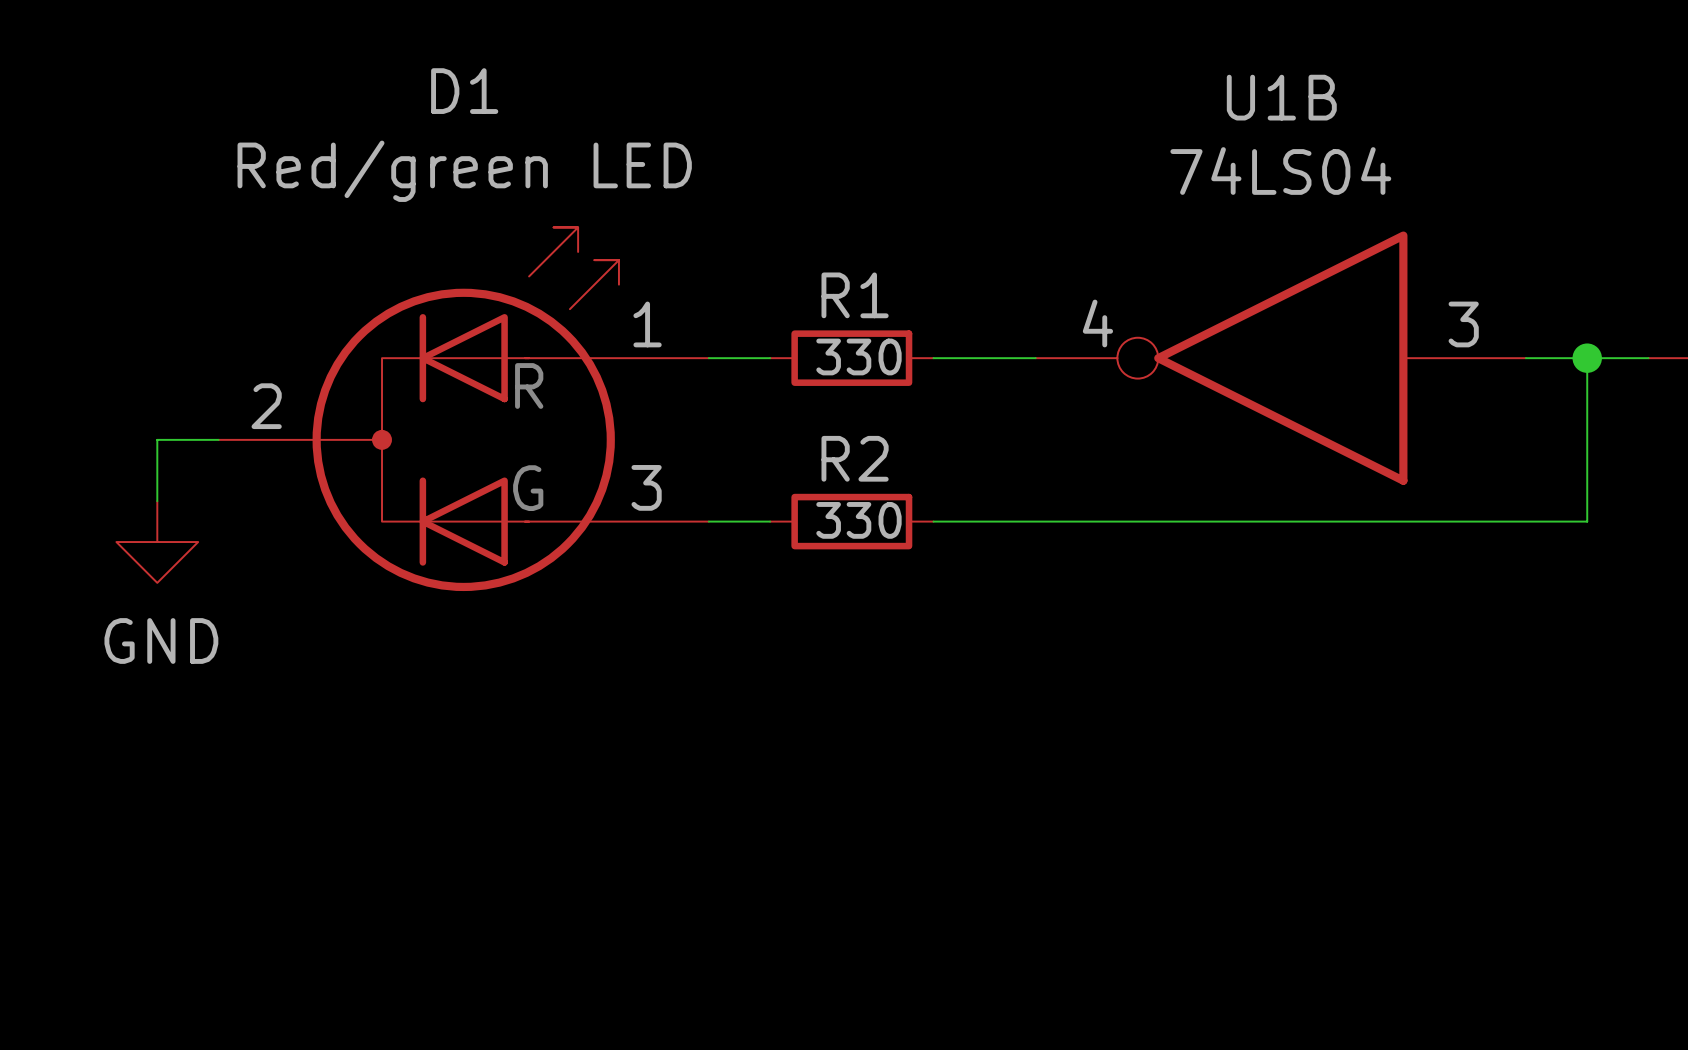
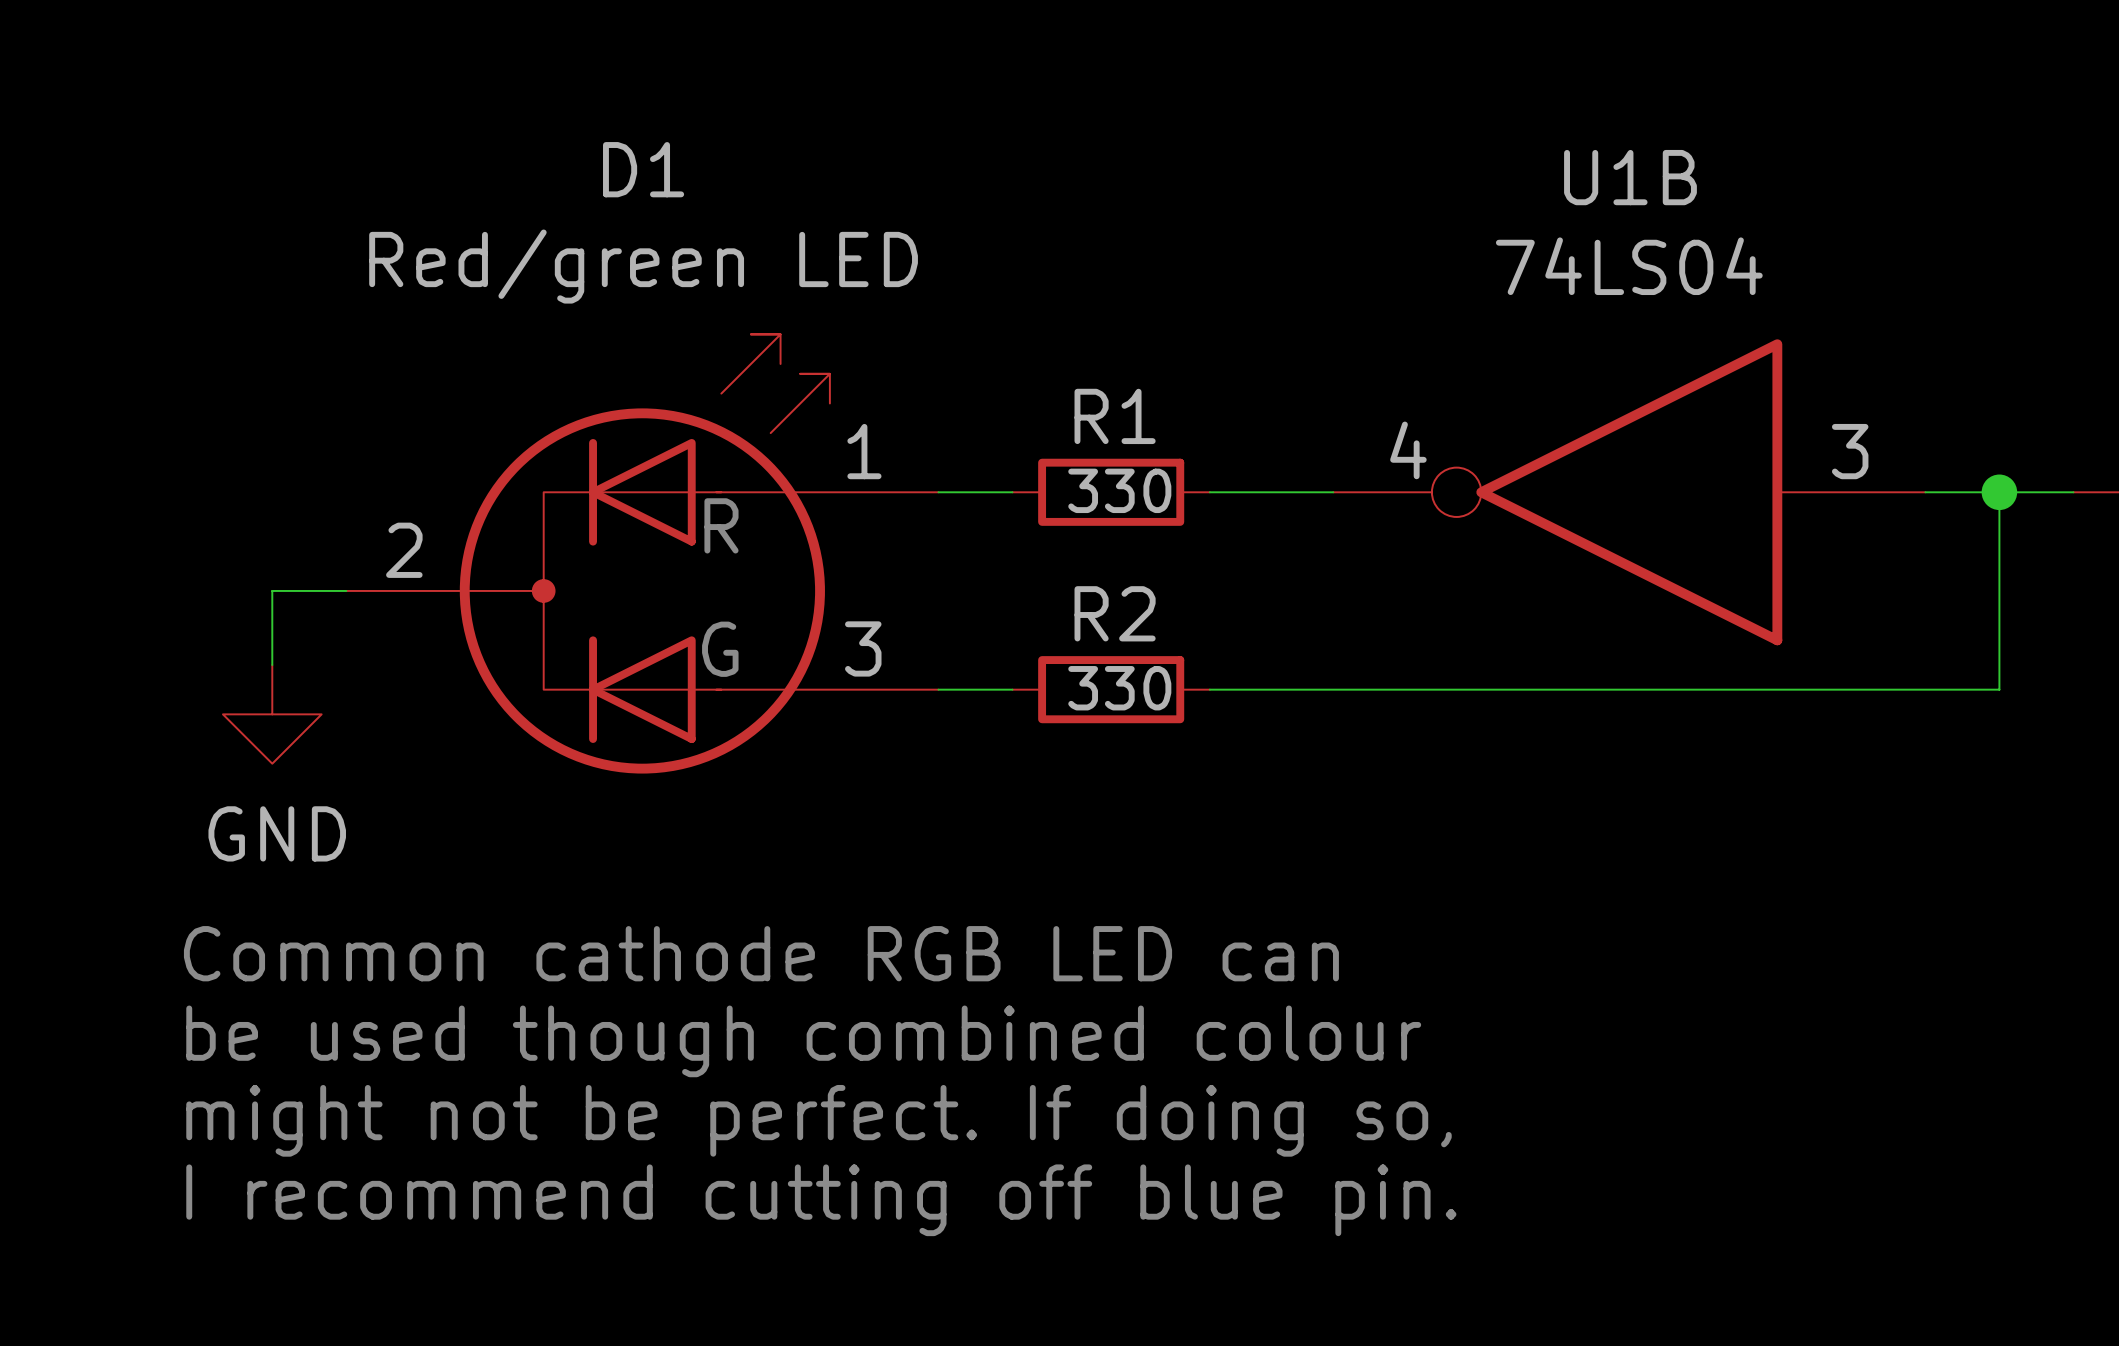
text: none -> Common cathode RGB LED can (761, 953)
text: none -> be used though combined colour (803, 1041)
text: none -> might not be perfect. If doing so, (818, 1120)
text: none -> I recommend cutting off blue pin. (821, 1200)

